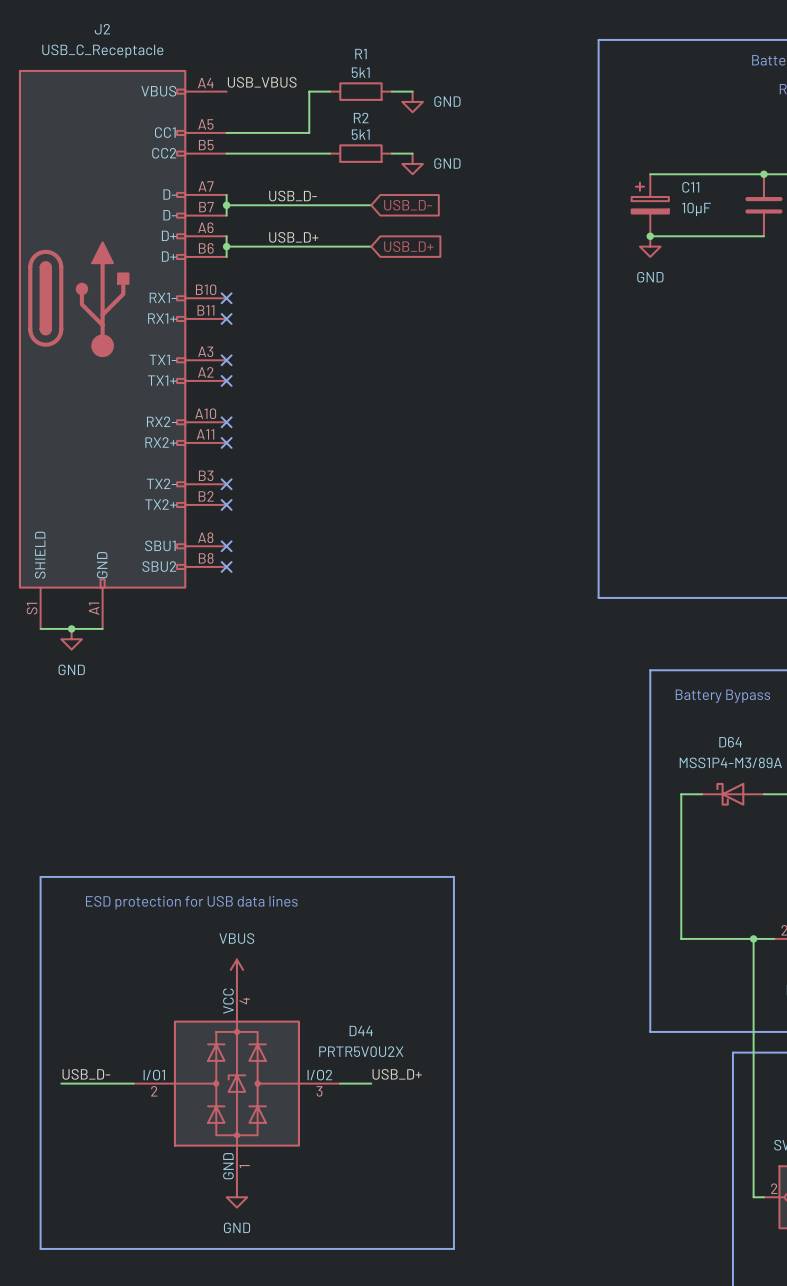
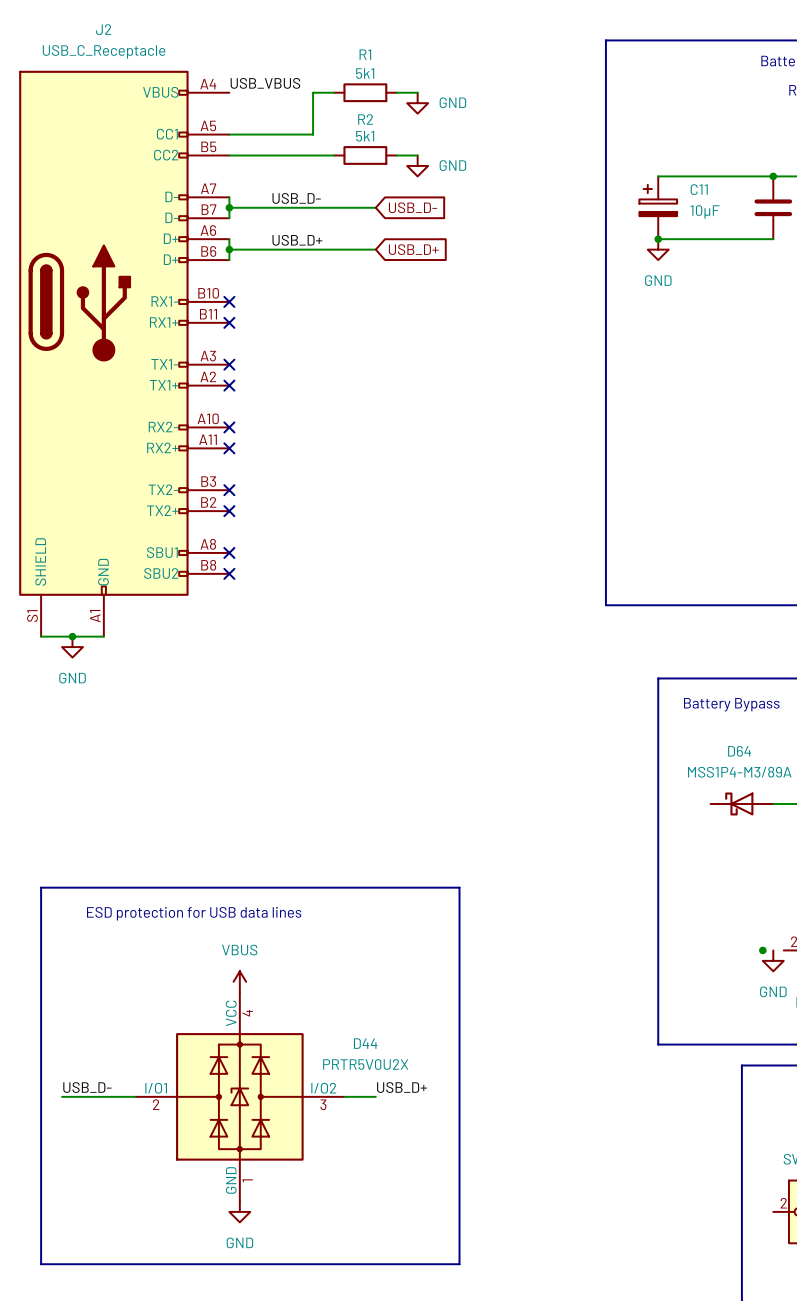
wire: (701, 794) (681, 794) (681, 938) (774, 938) -> none
wire: (753, 938) (753, 1197) (763, 1197) -> none
power symbol: none -> GND (773, 960)

